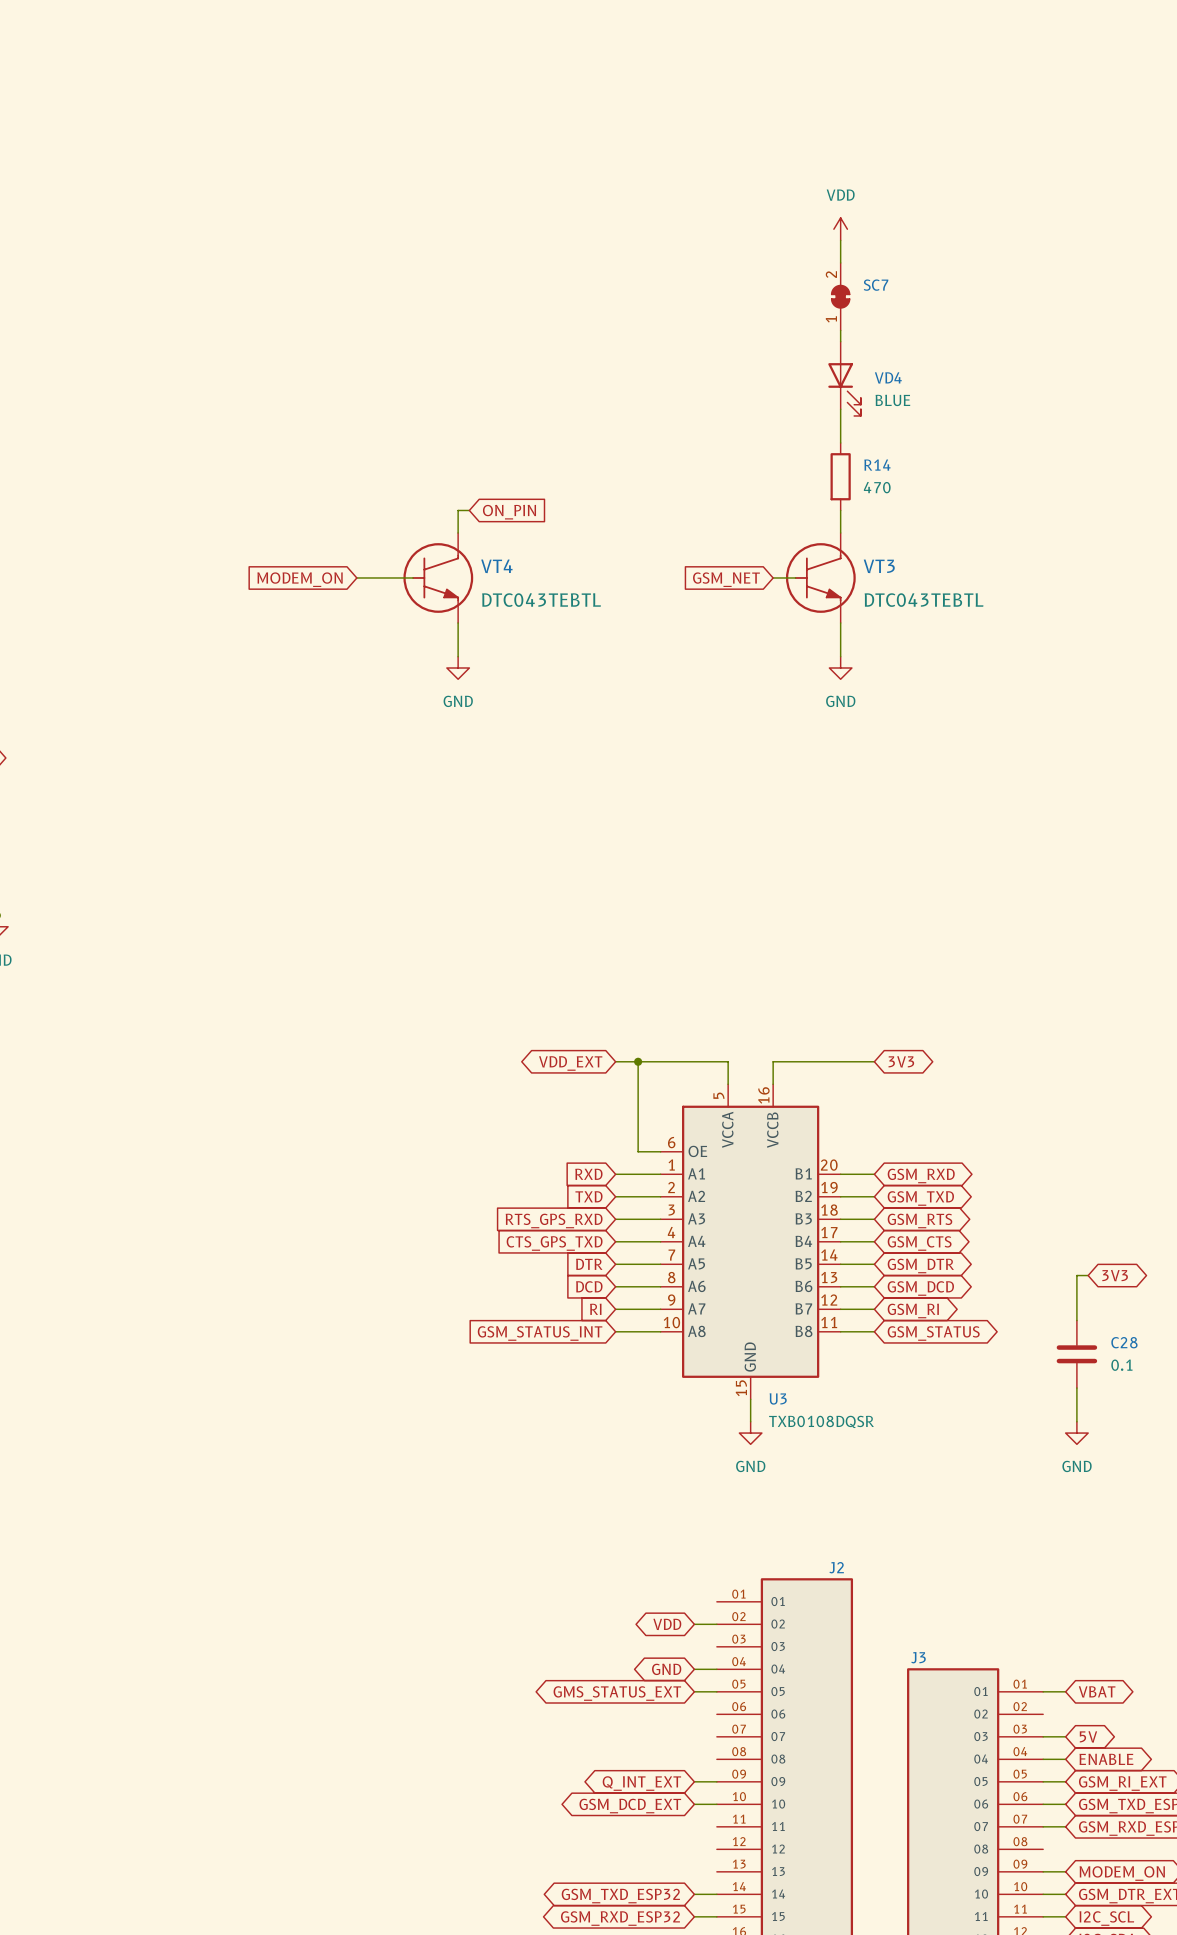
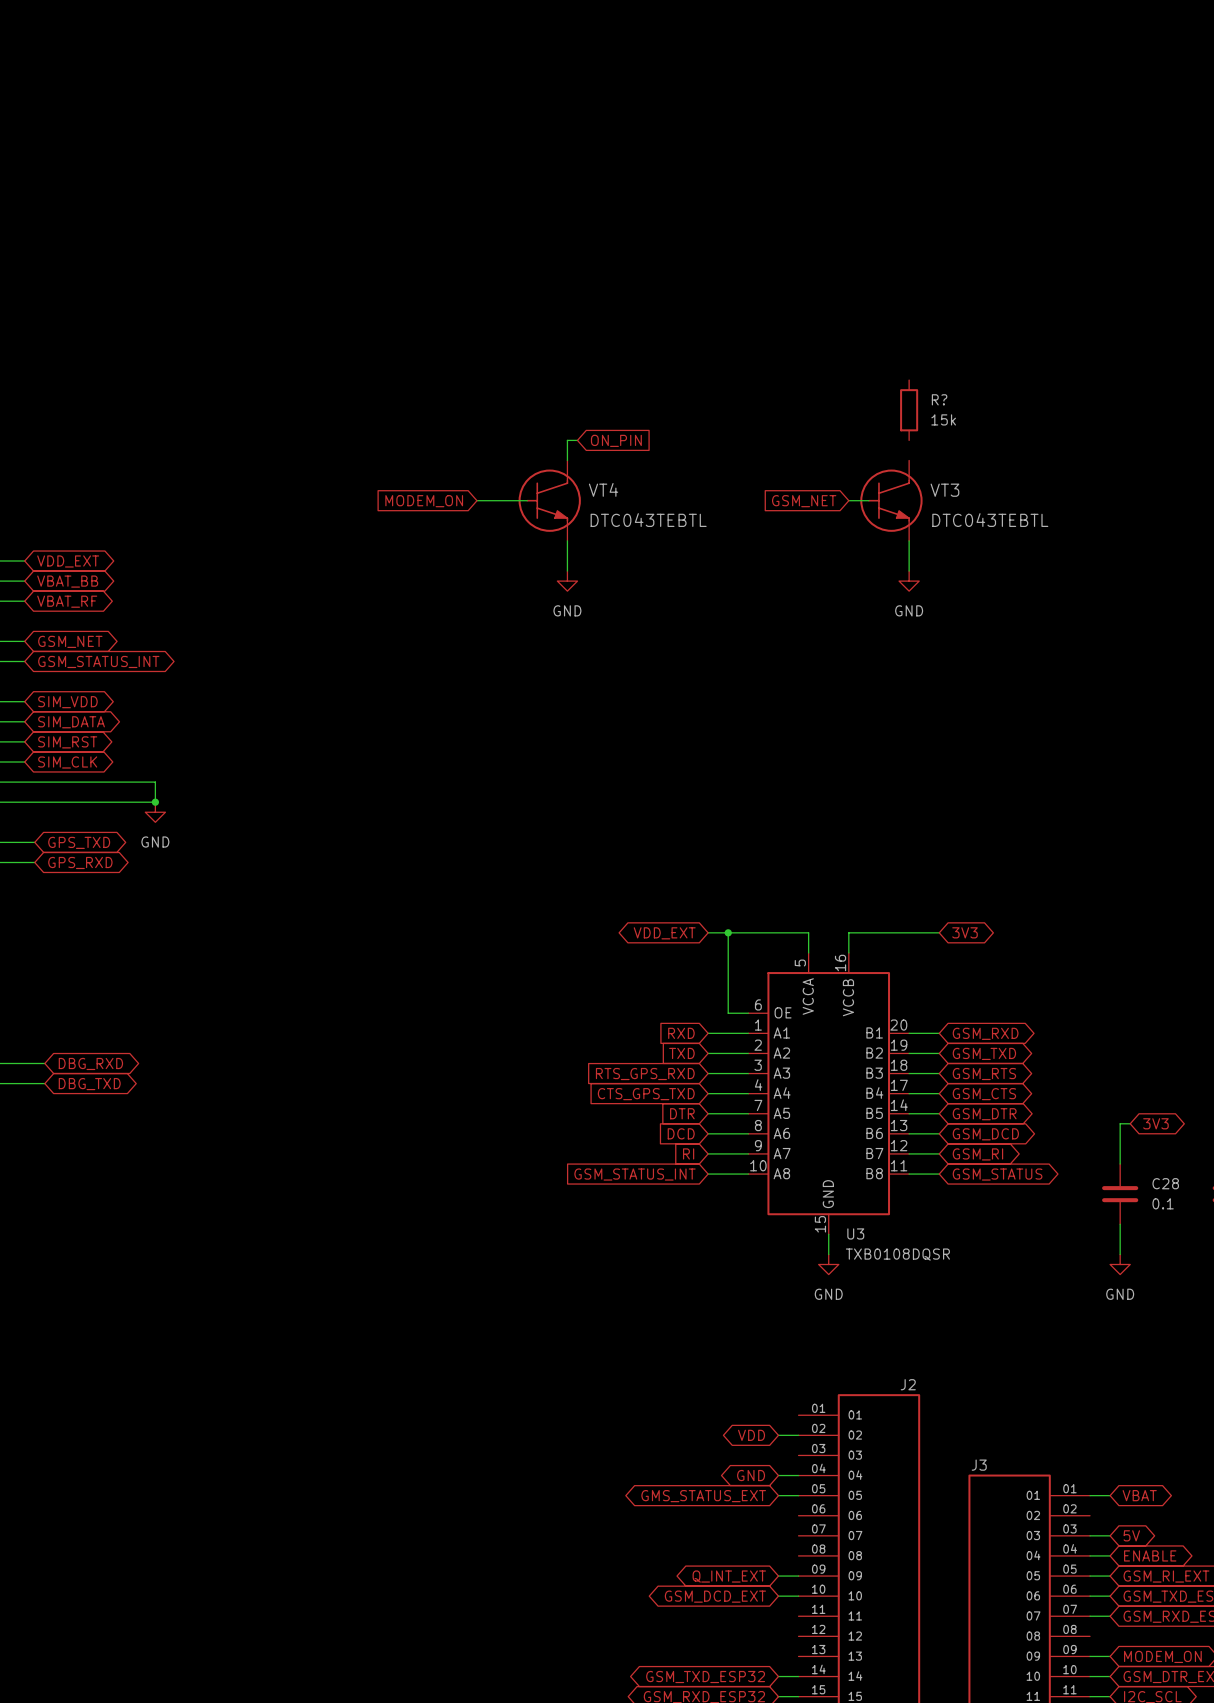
power symbol: VDD (840, 229) -> none
wire: (840, 240) (840, 262) -> none
SC7: (840, 296) -> none
wire: (840, 330) (840, 341) -> none
VD4: BLUE (844, 378) -> none
wire: (840, 409) (840, 442) -> none
R14 name: R14 (877, 465) -> R? (939, 399)
R14 value: 470 (877, 487) -> 15k (943, 419)
wire: (840, 510) (840, 532) -> none

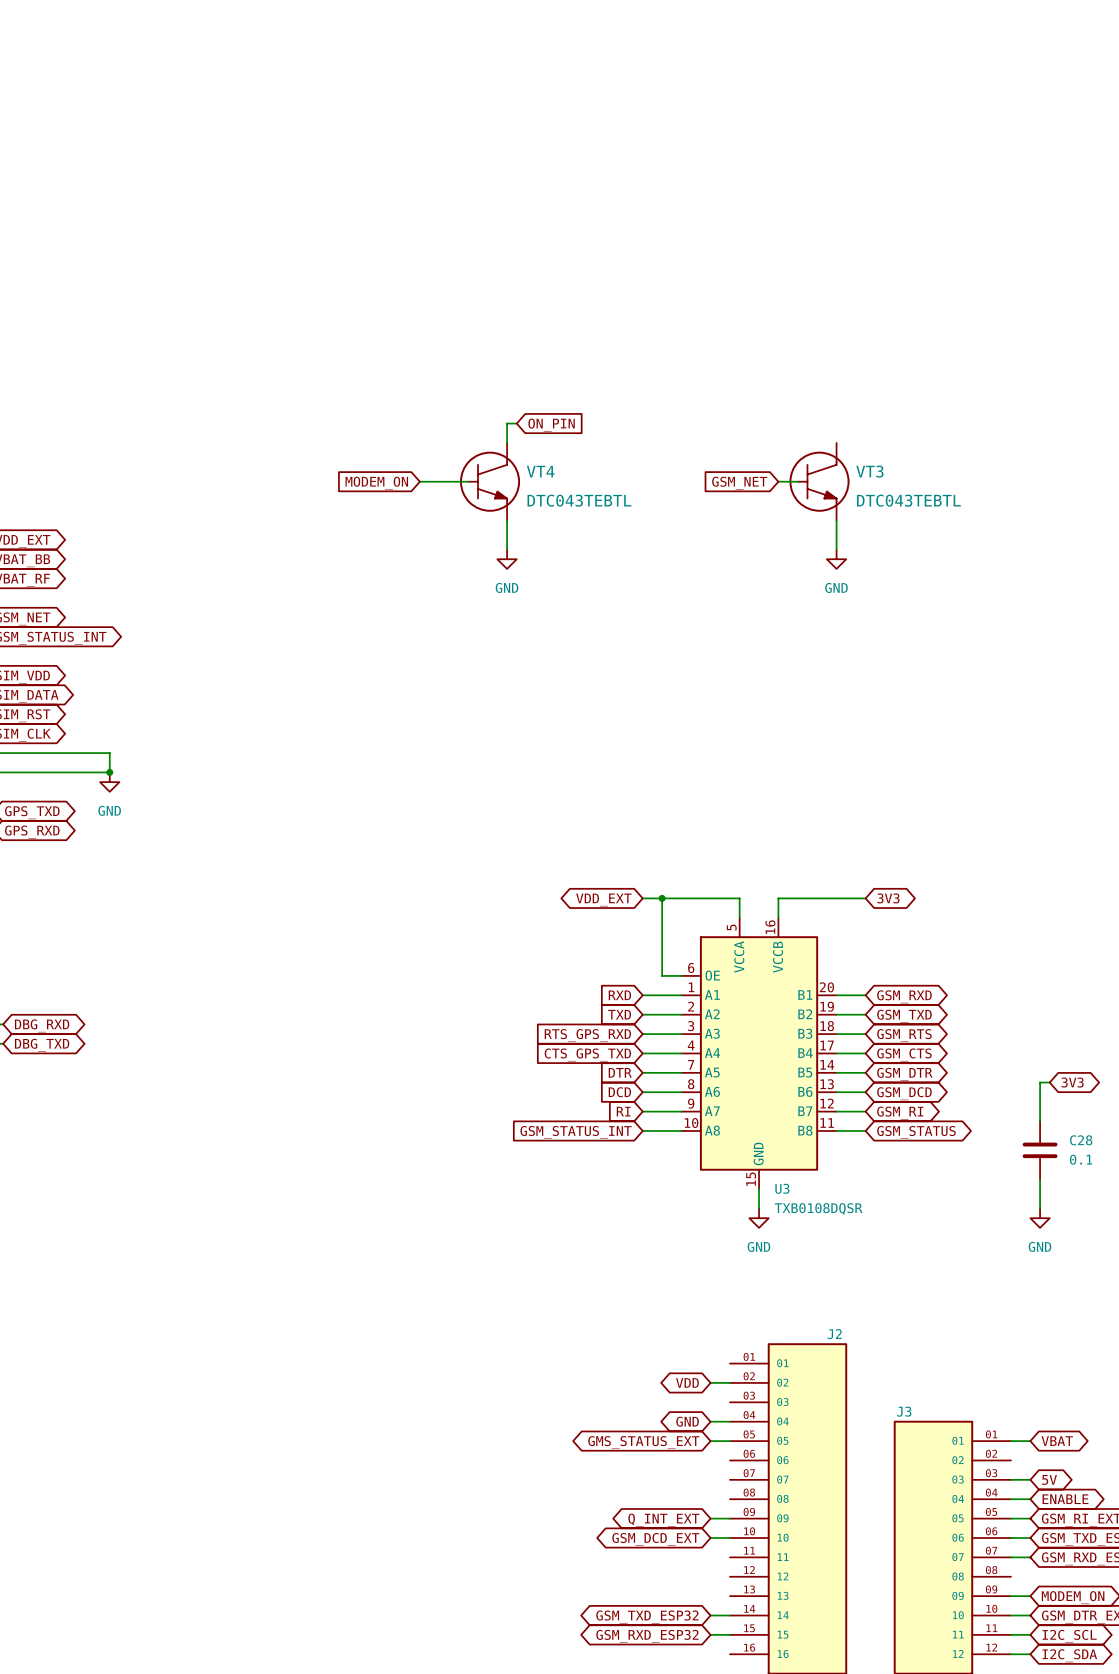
R?: 15k (909, 410) -> none

